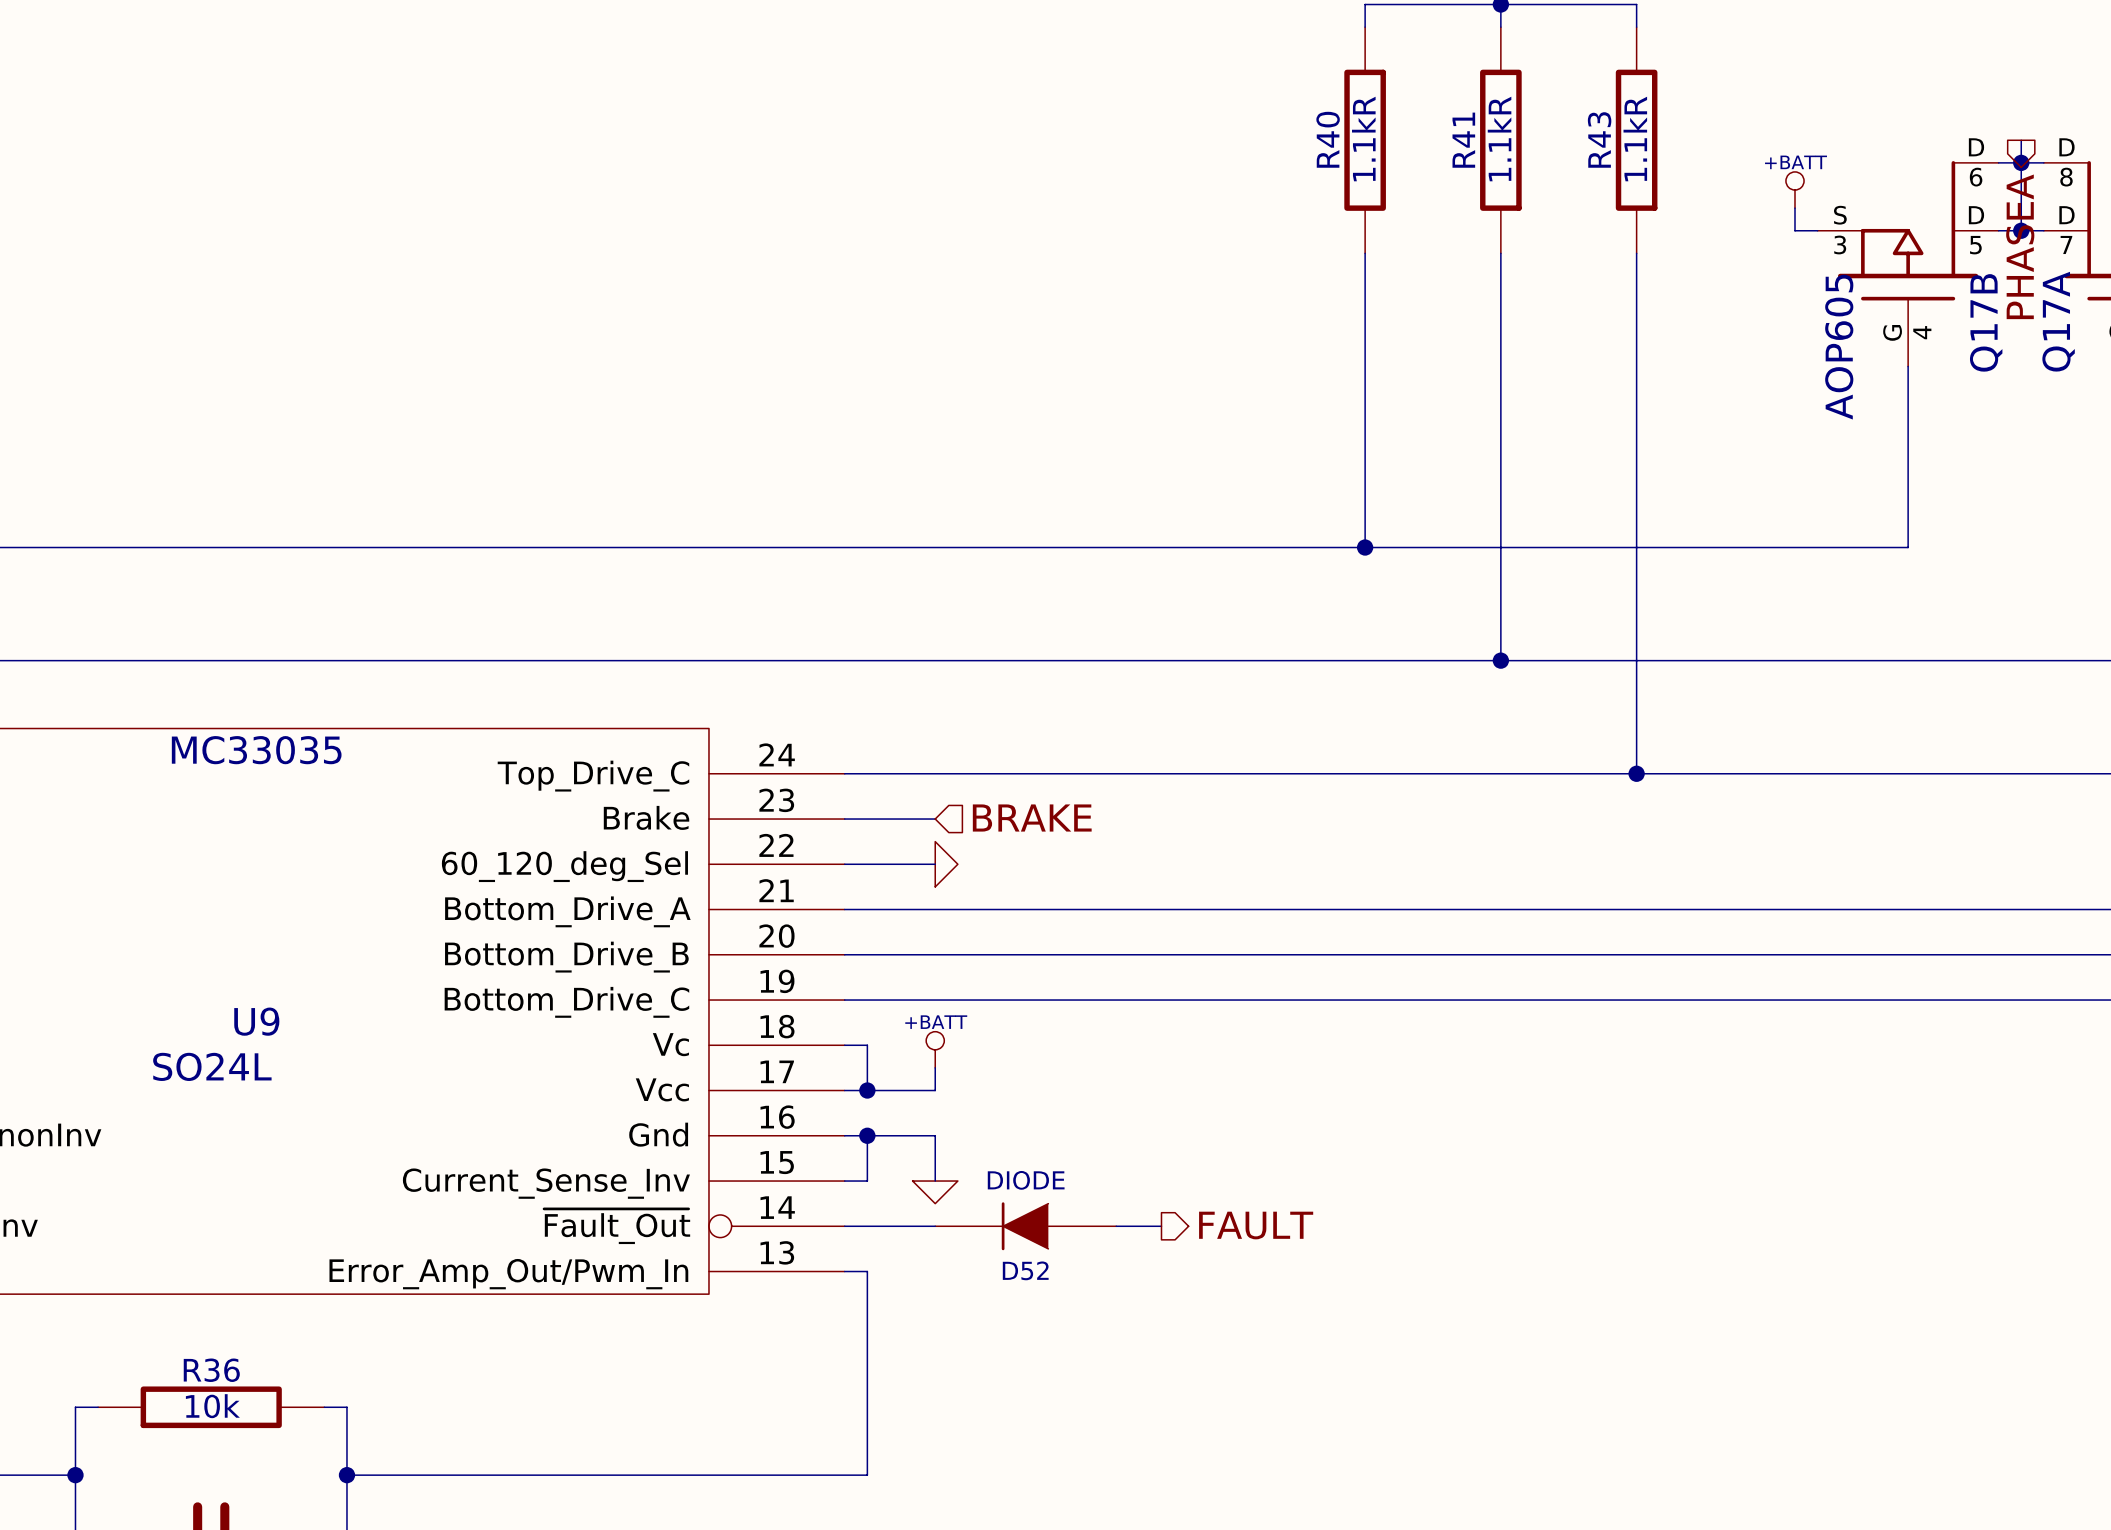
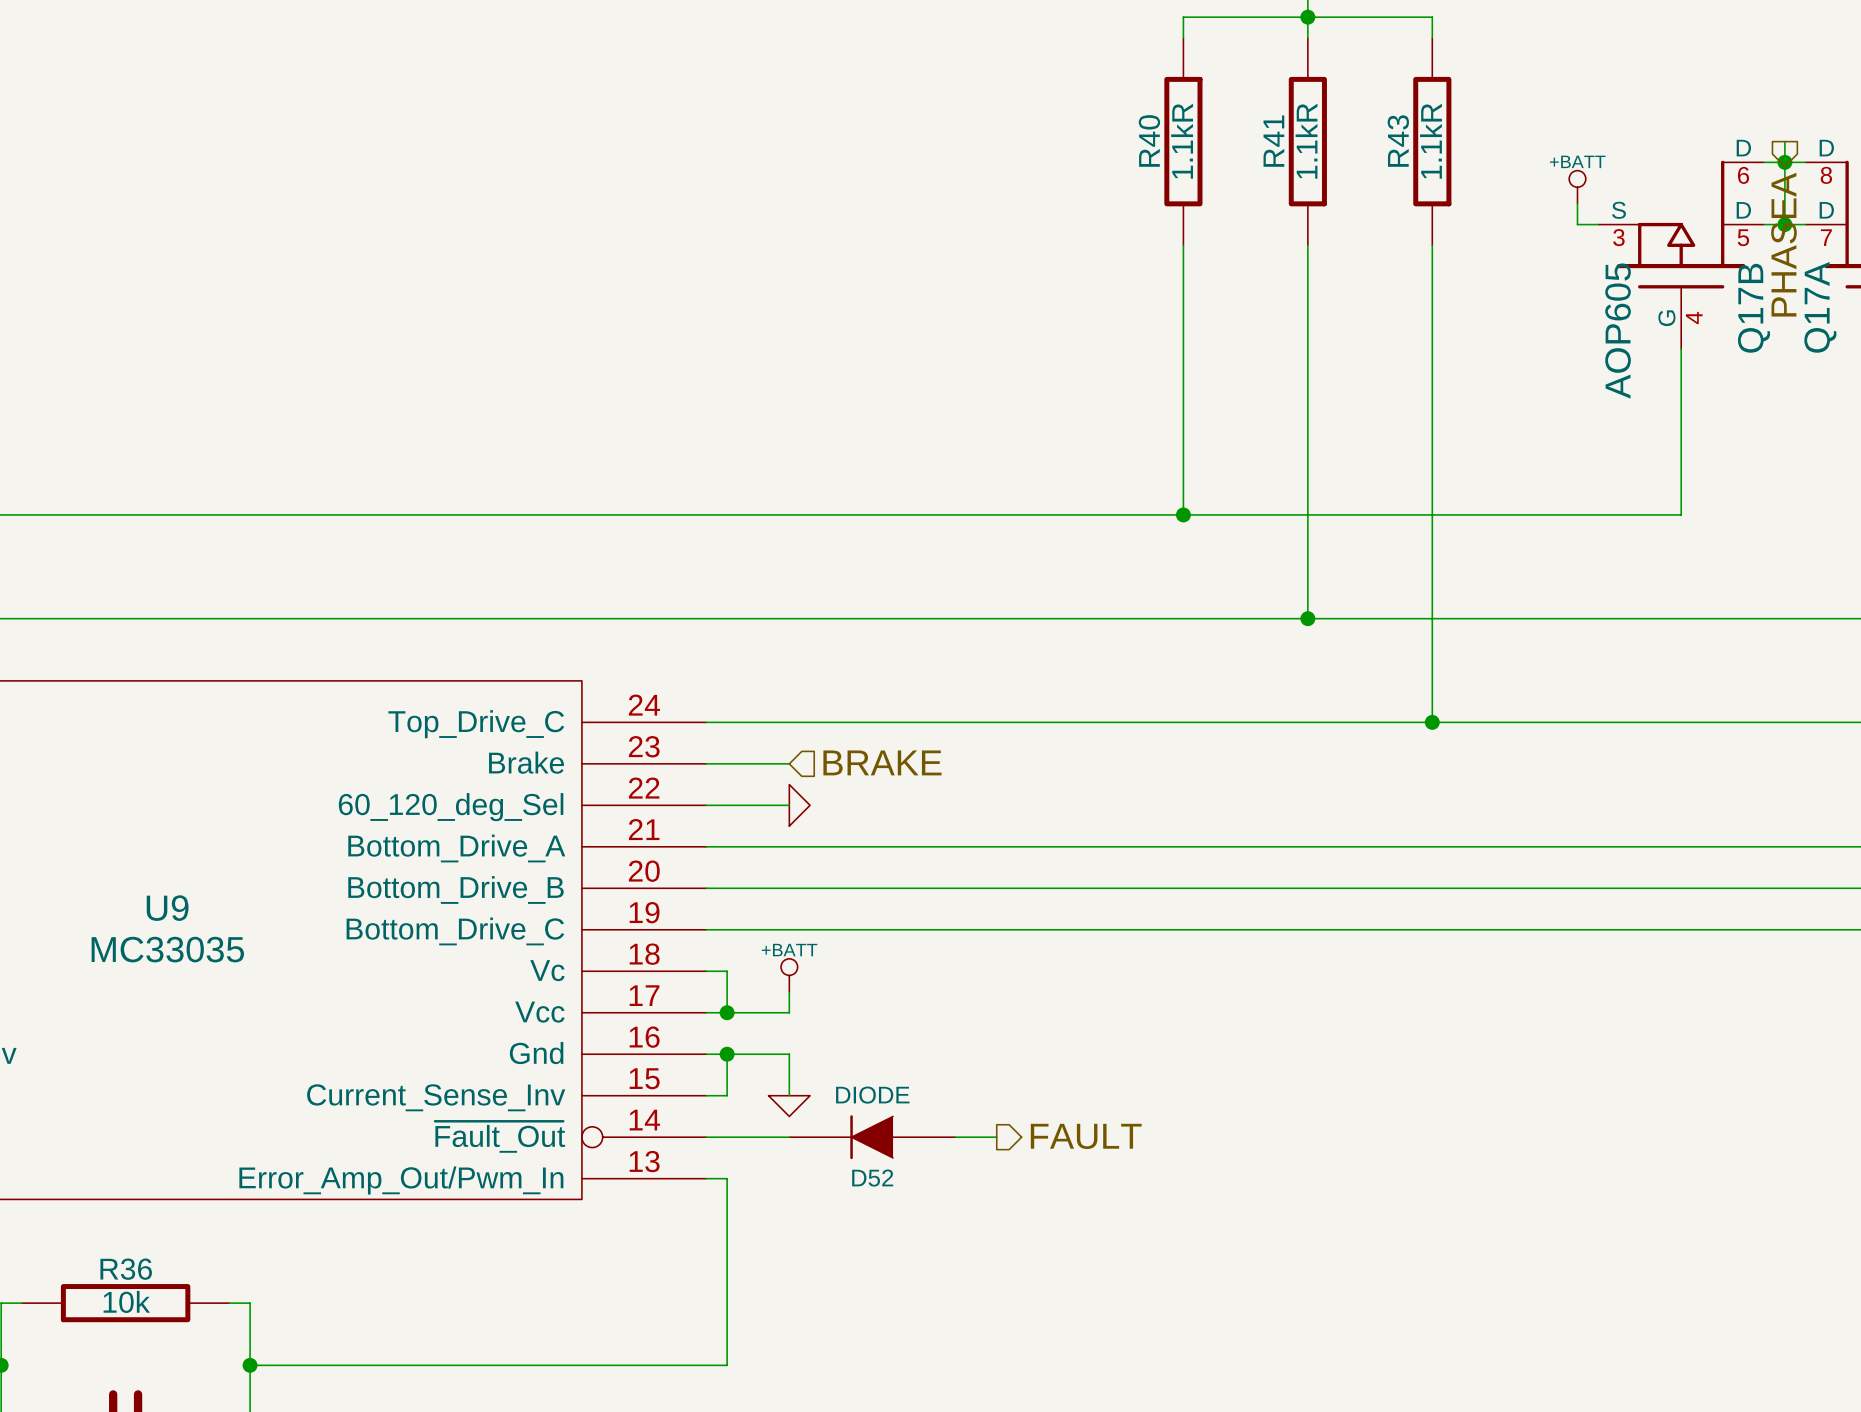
U9 value position: MC33035 (256, 750) -> MC33035 (167, 949)
U9 name position: U9 (256, 1021) -> U9 (167, 908)
U9 text: SO24L (212, 1066) -> none

